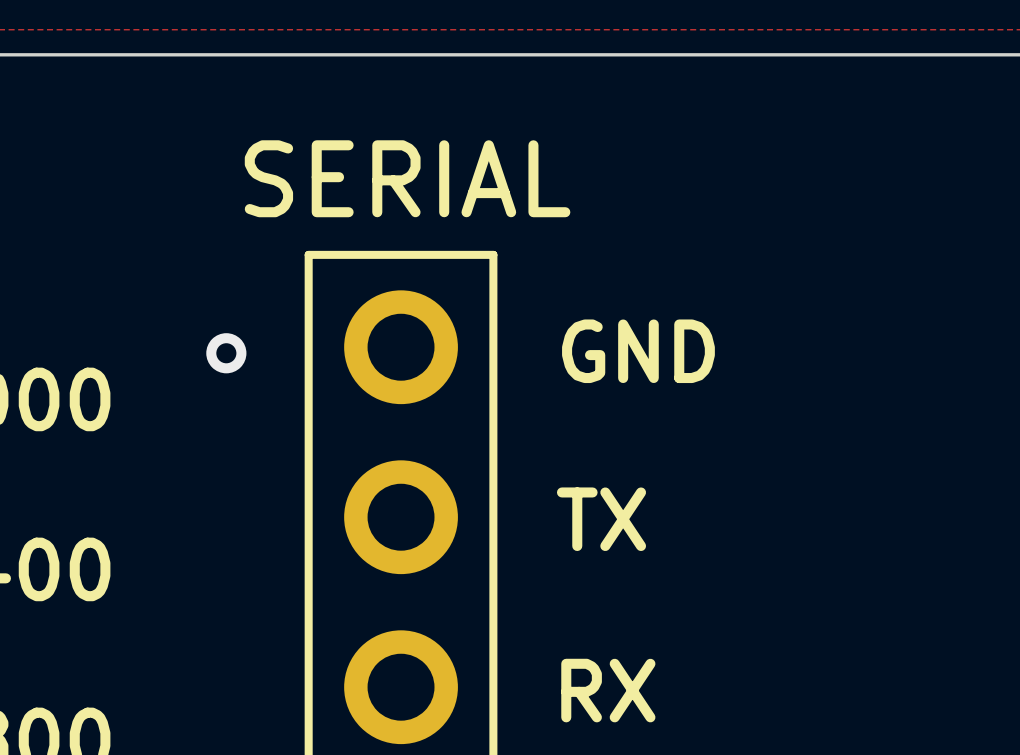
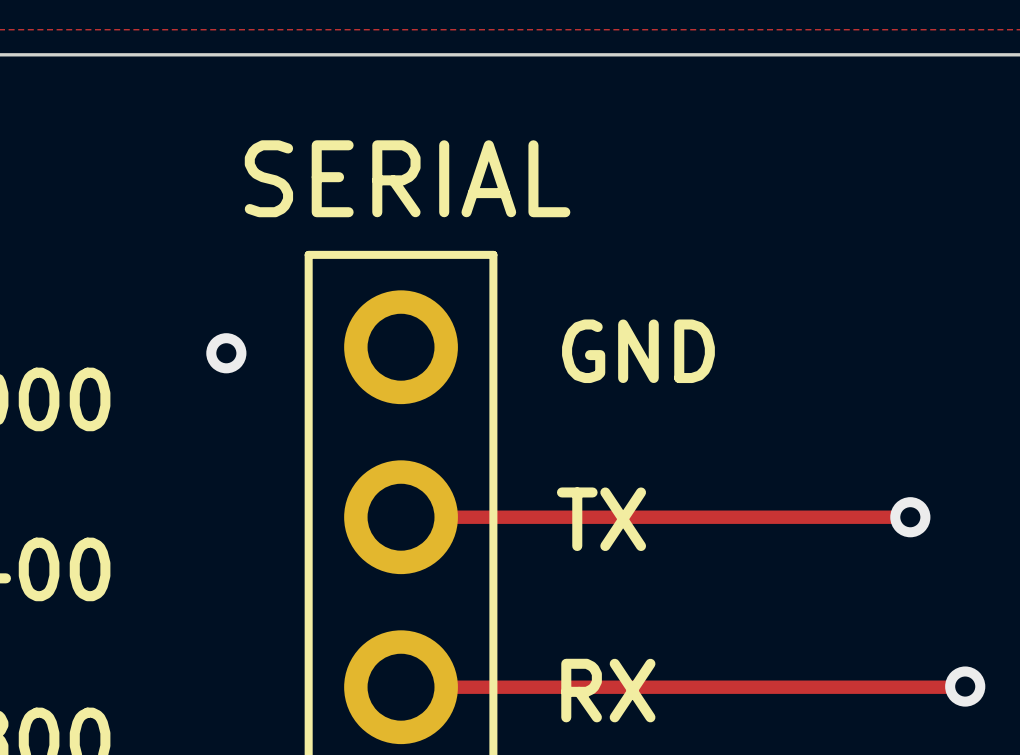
track: none -> (401, 517) (910, 517)
via: none -> (910, 517)
via: none -> (965, 686)
track: none -> (401, 687) (964, 687)

